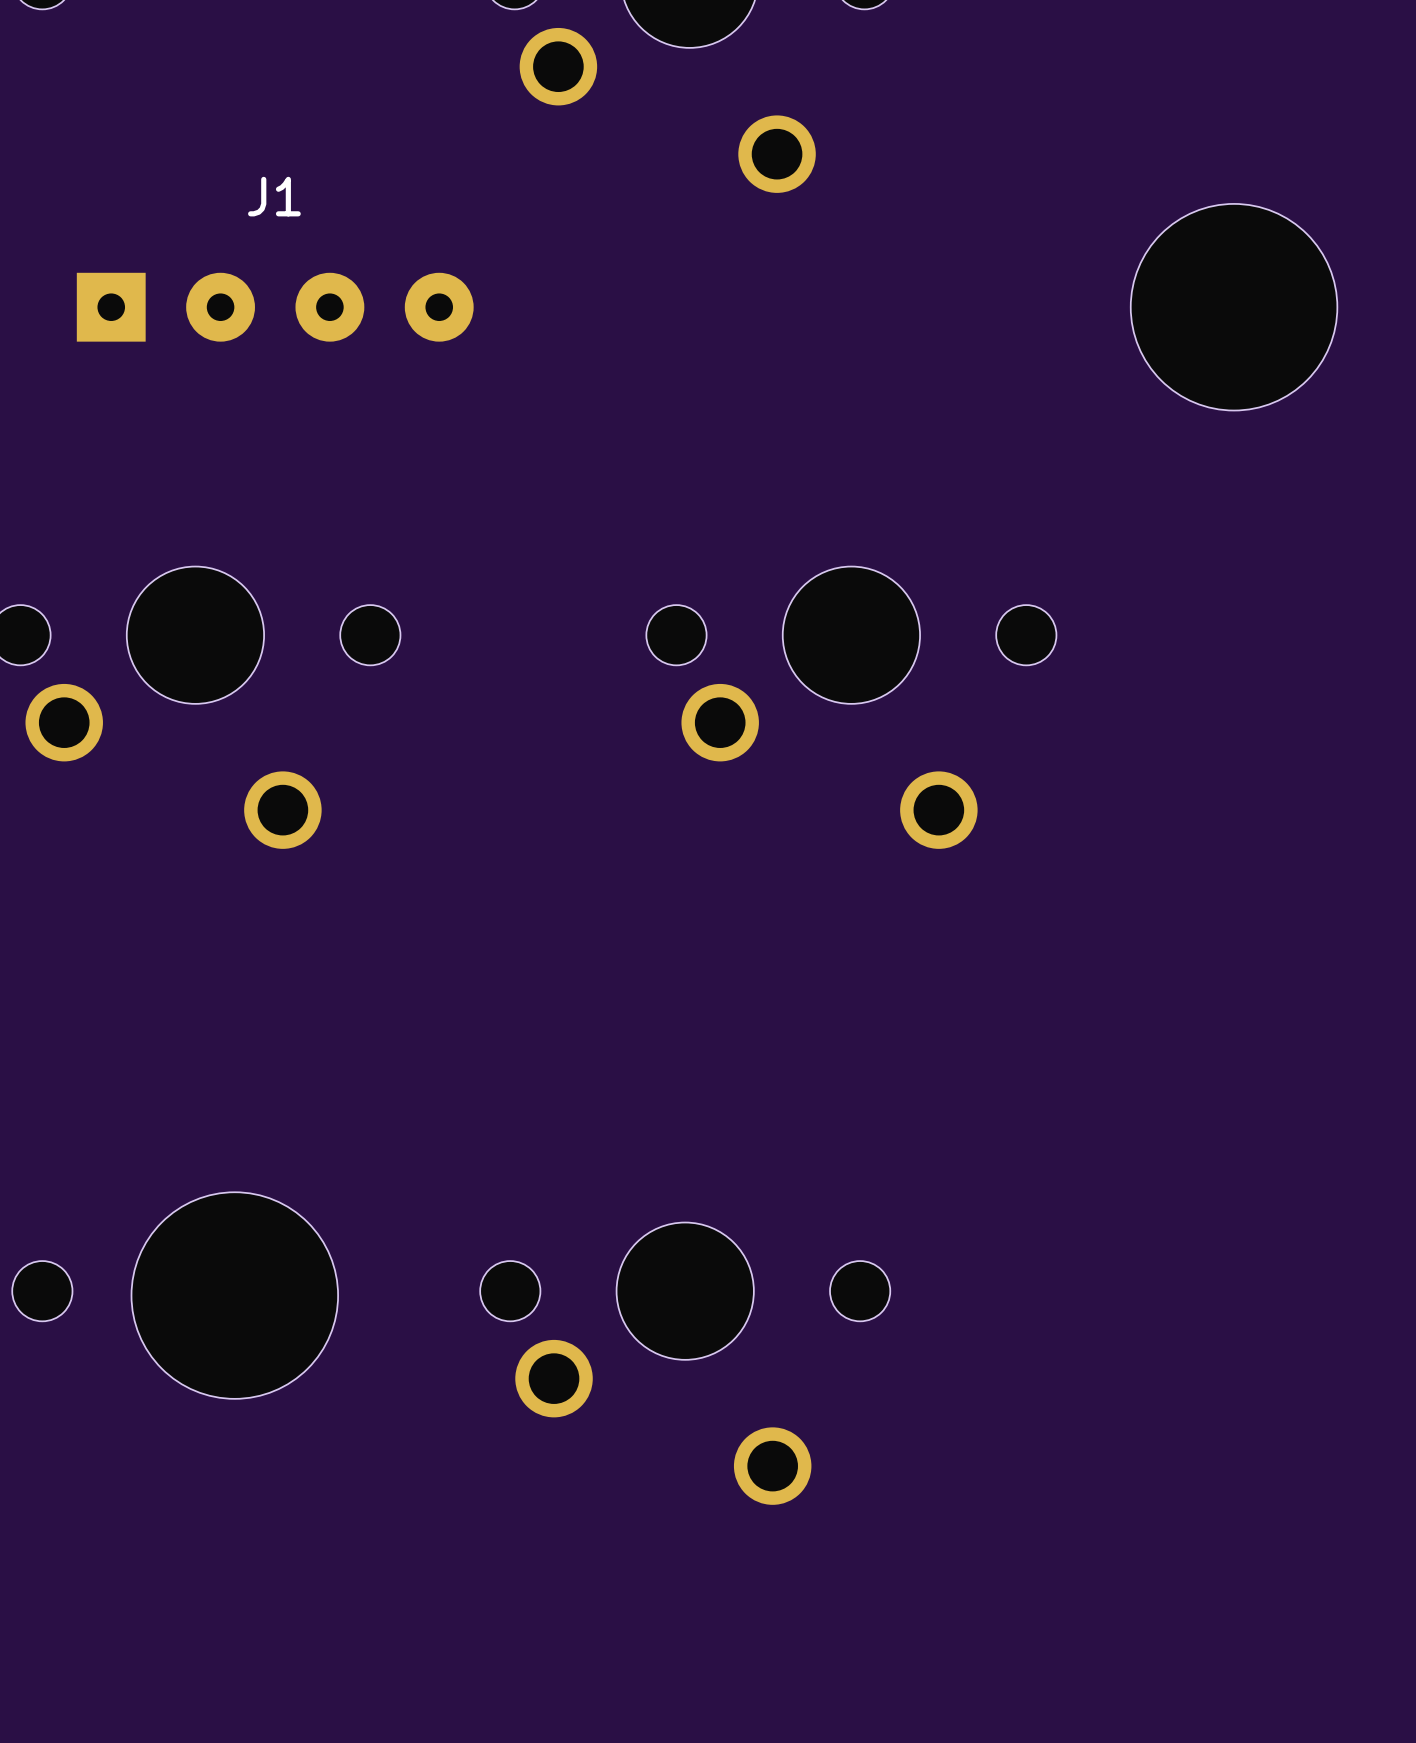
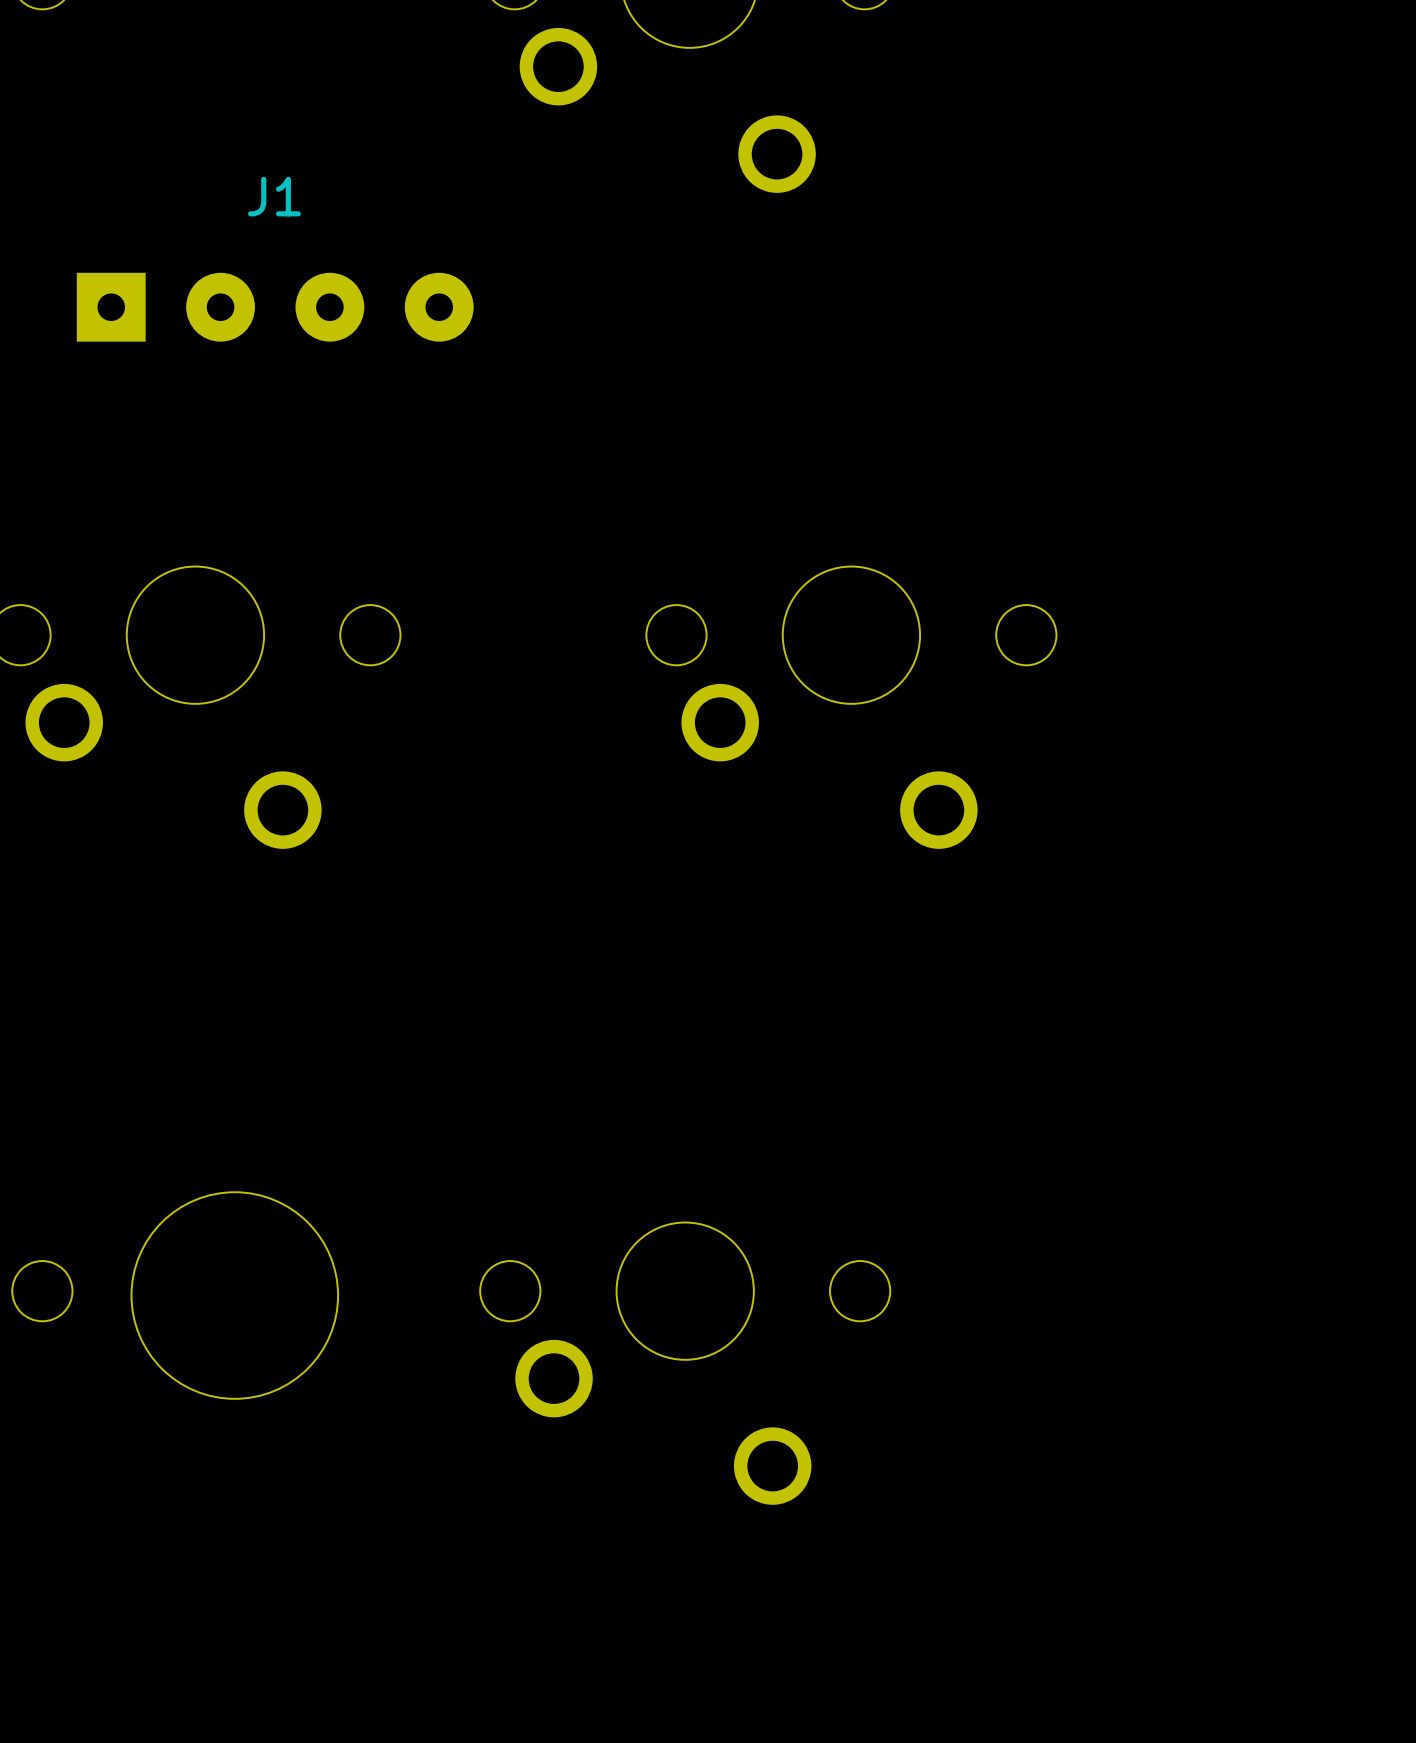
part: (1234, 307) -> none

